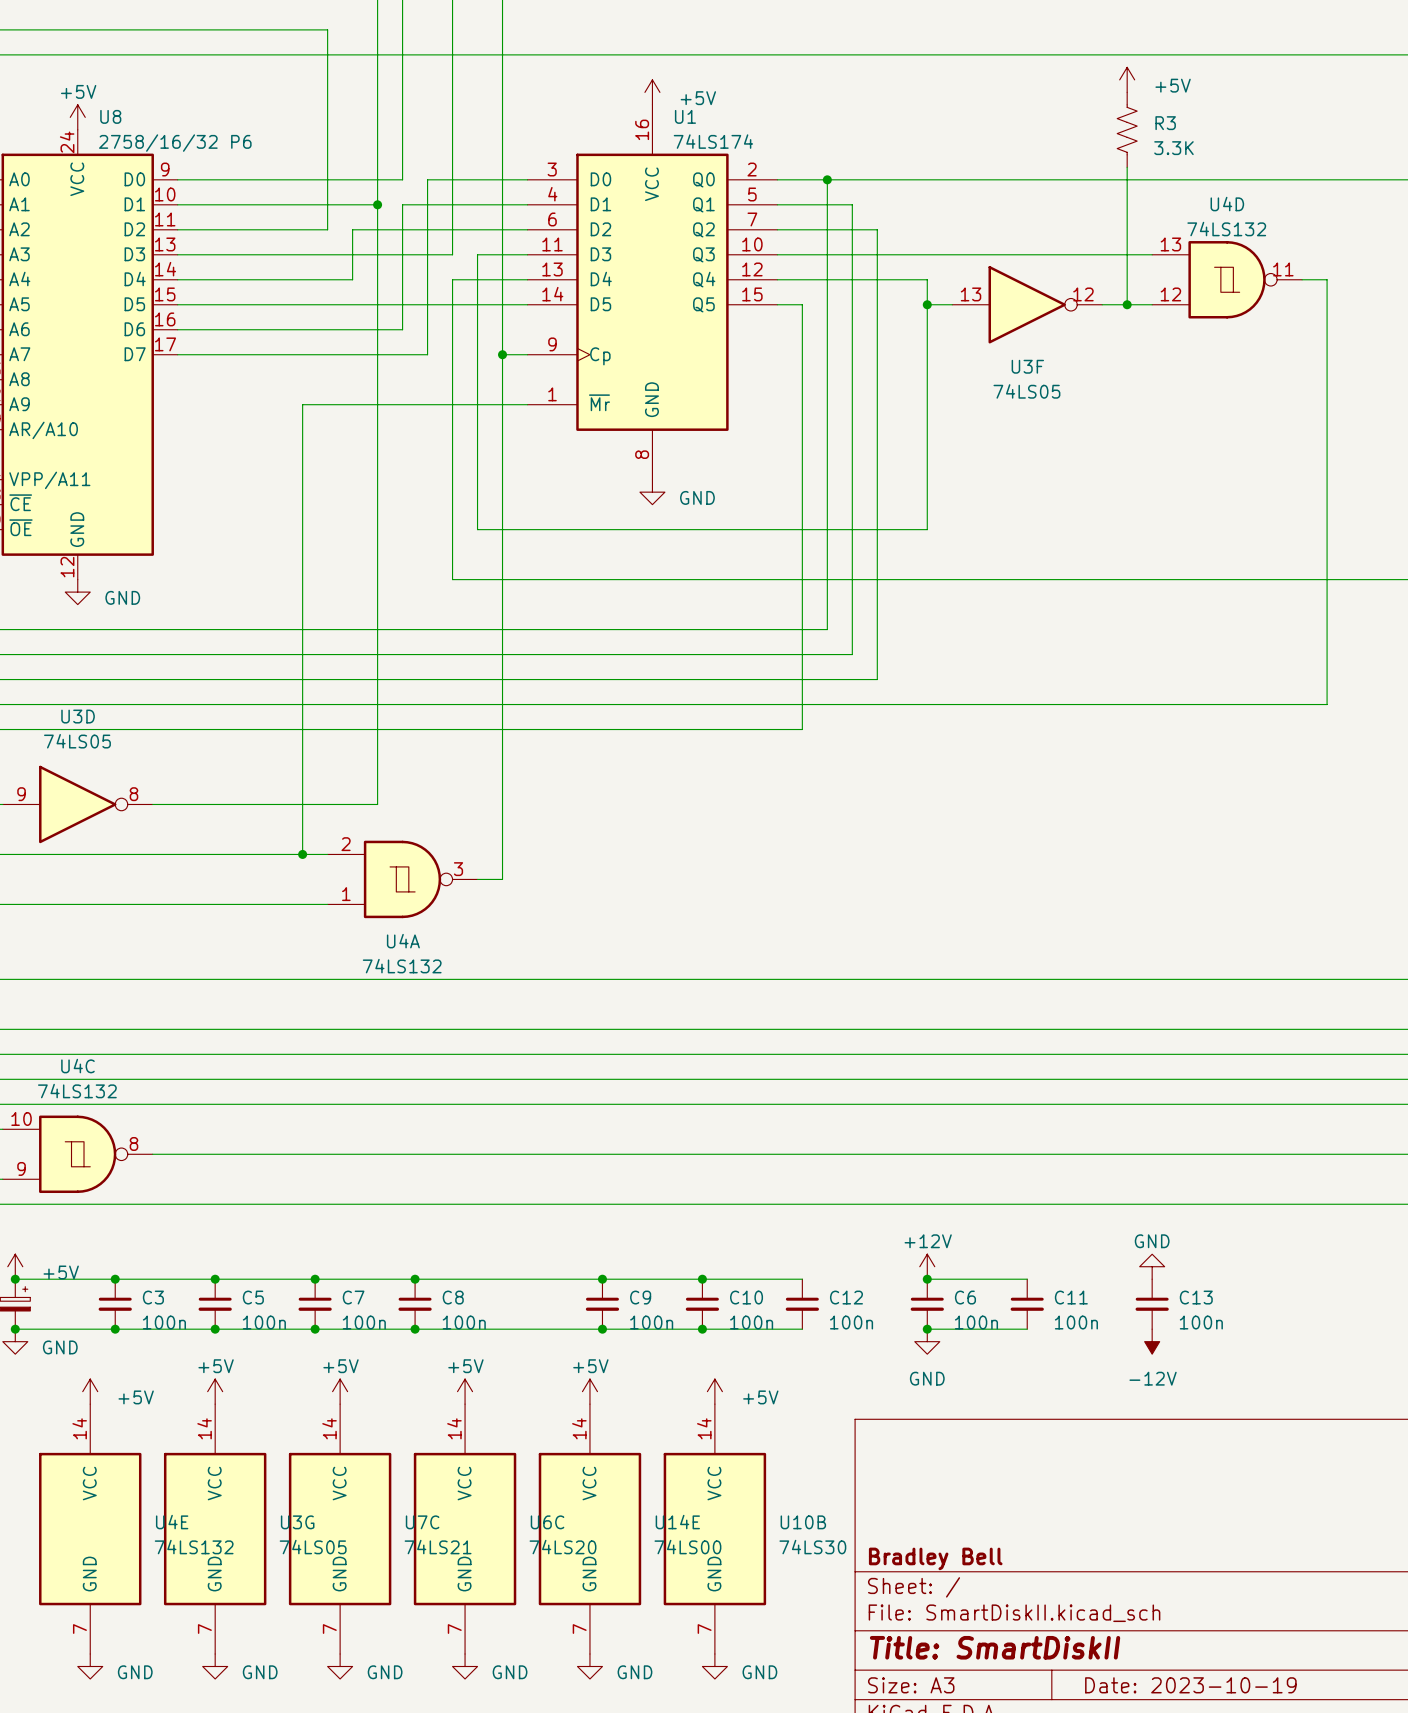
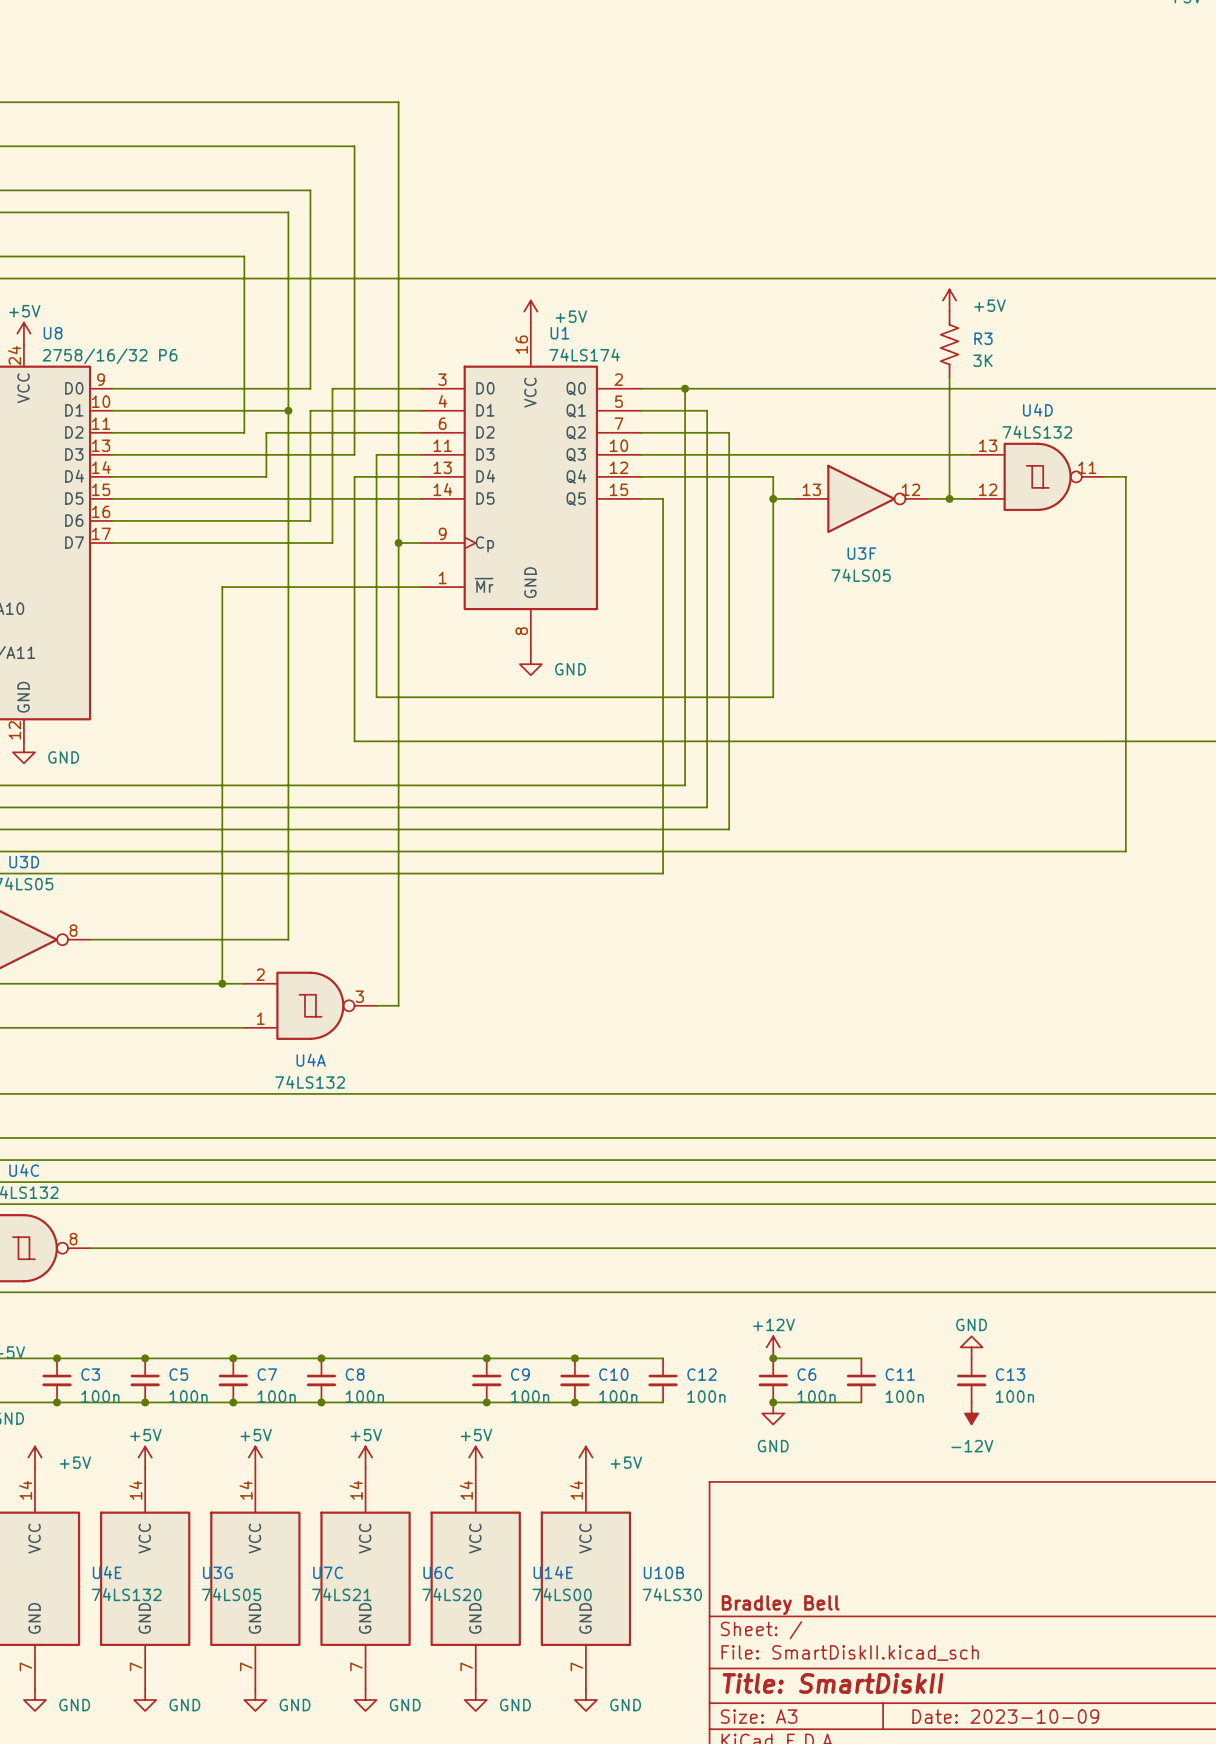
R3 value: 3.3K (1173, 148) -> 3K (982, 360)
title block: Date: 2023-10-19 (1190, 1685) -> Date: 2023-10-09 (1005, 1716)

